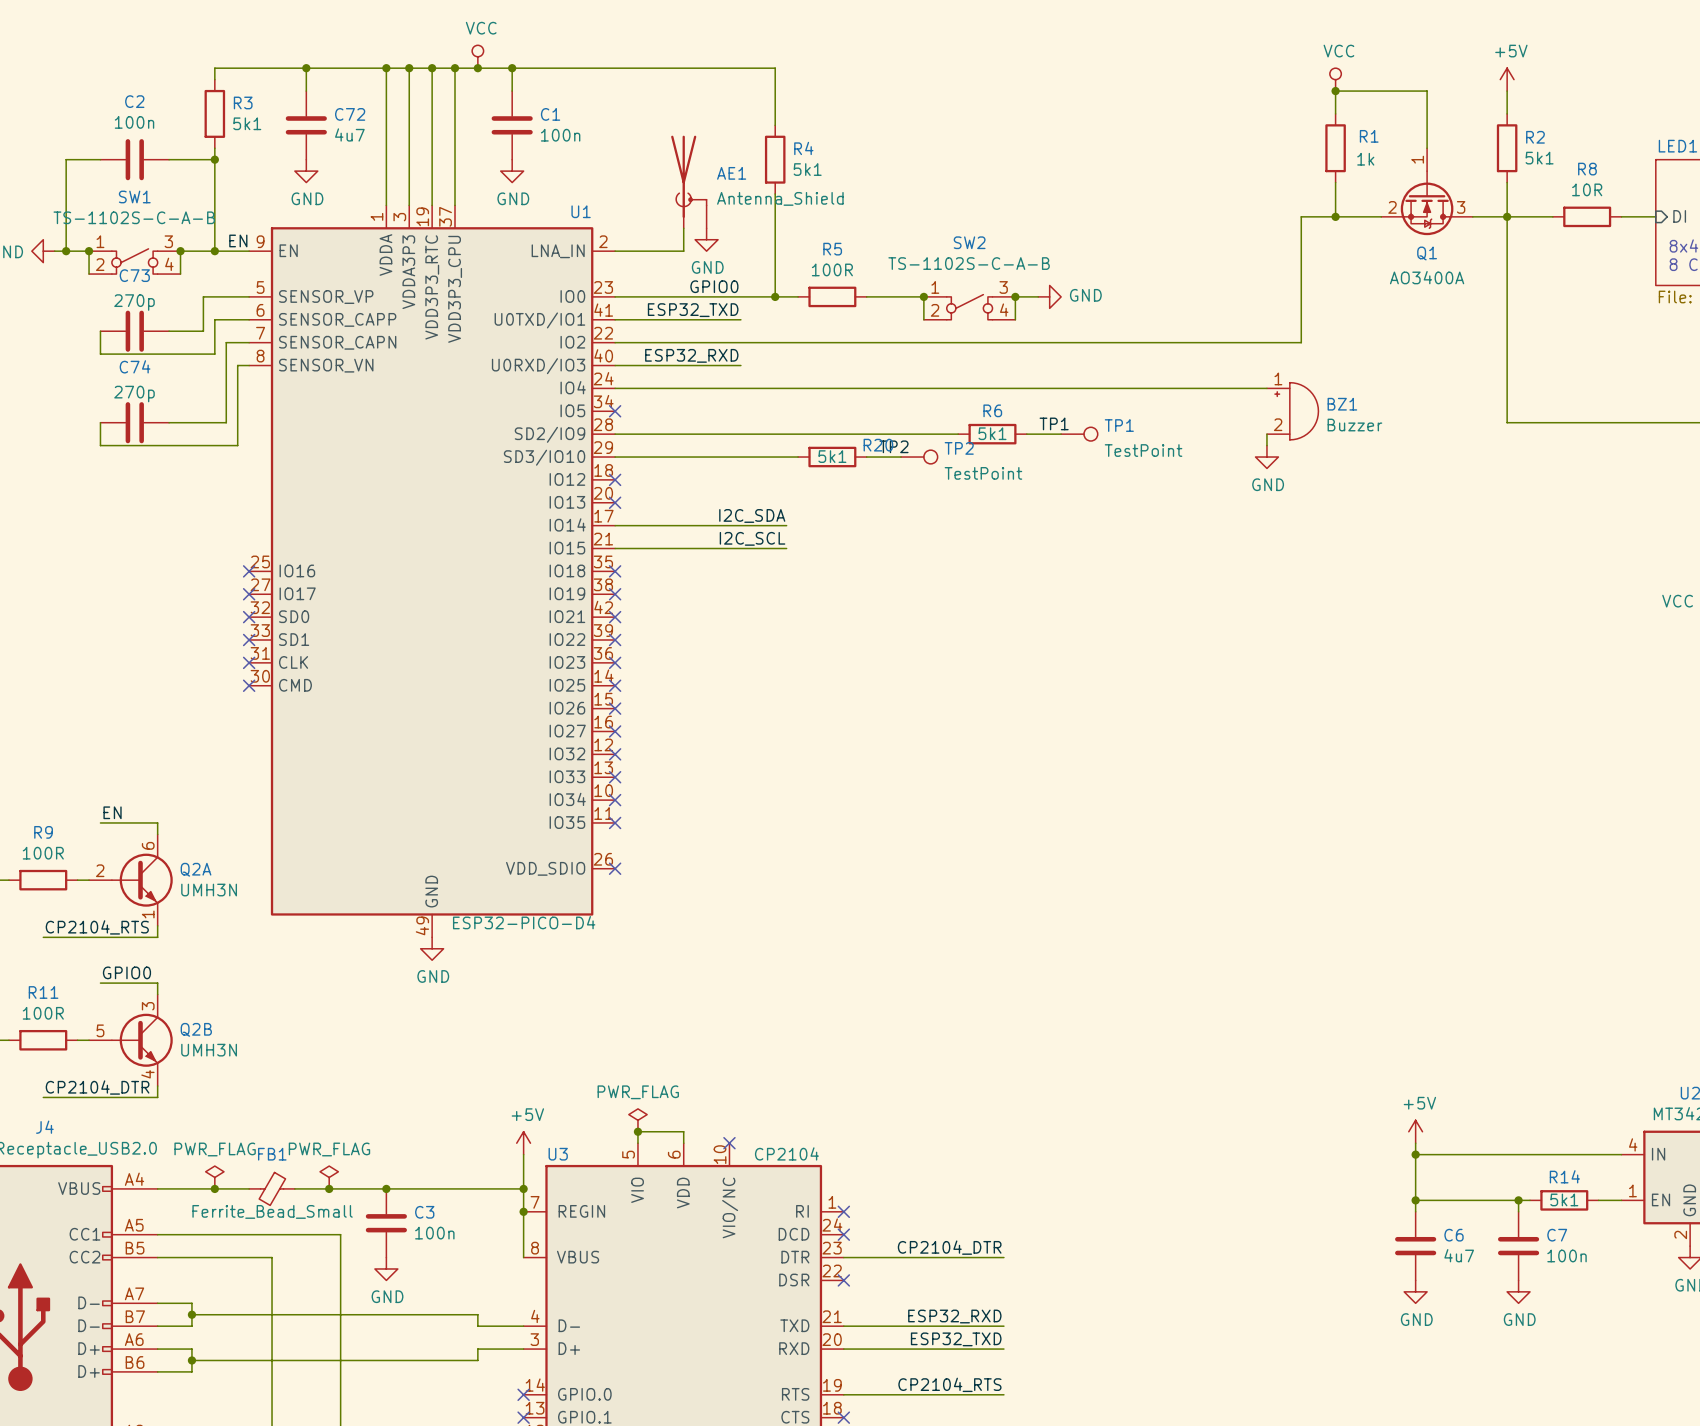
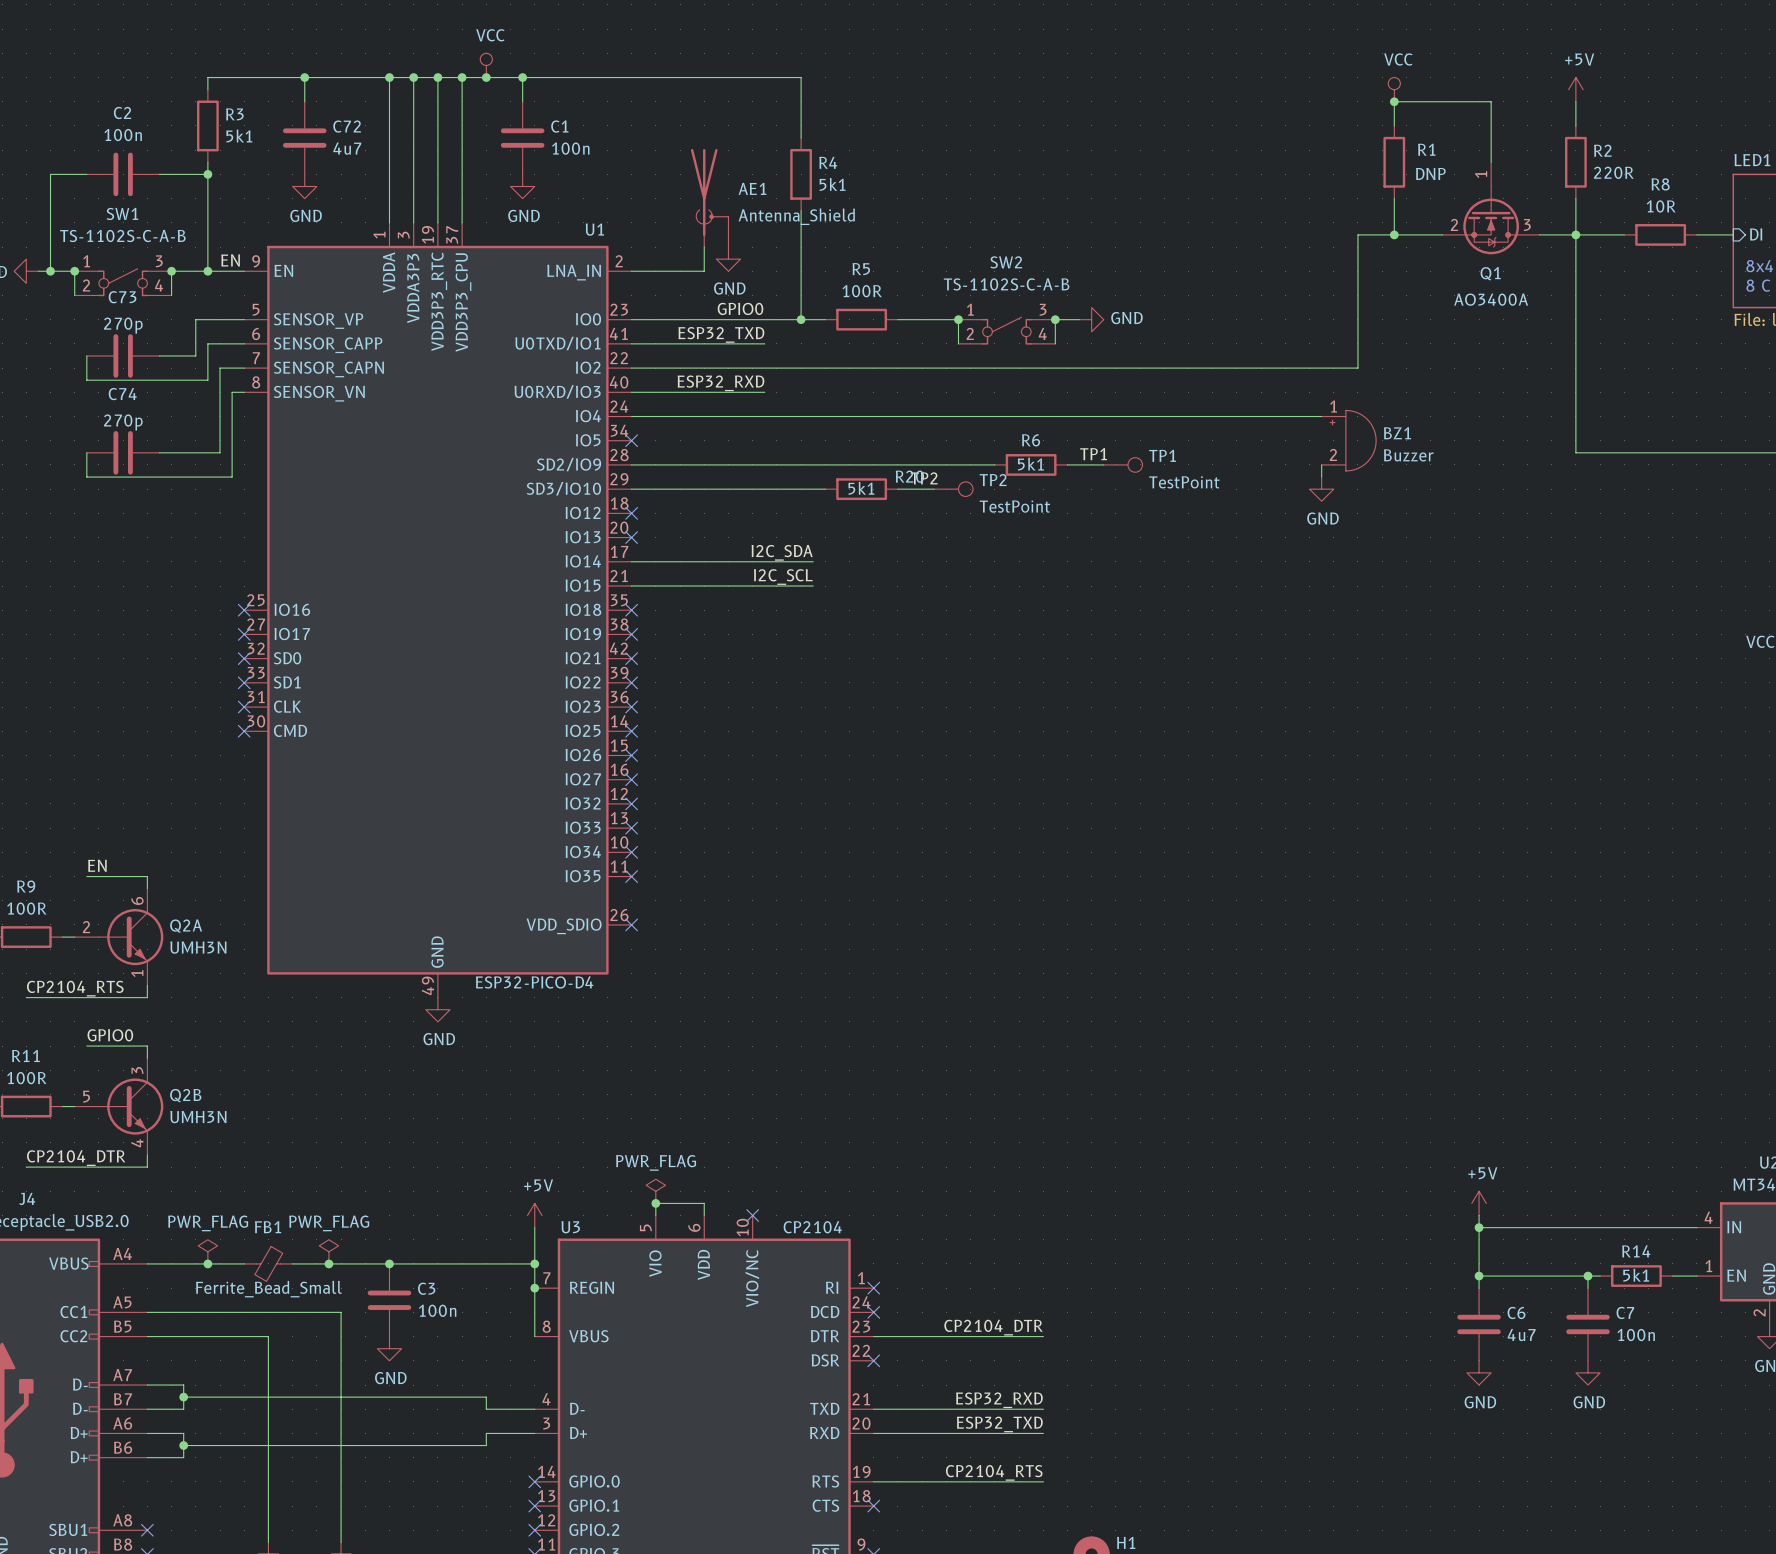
R2 value: 5k1 (1539, 158) -> 220R (1613, 172)
R1 value: 1k (1365, 159) -> DNP (1430, 173)

